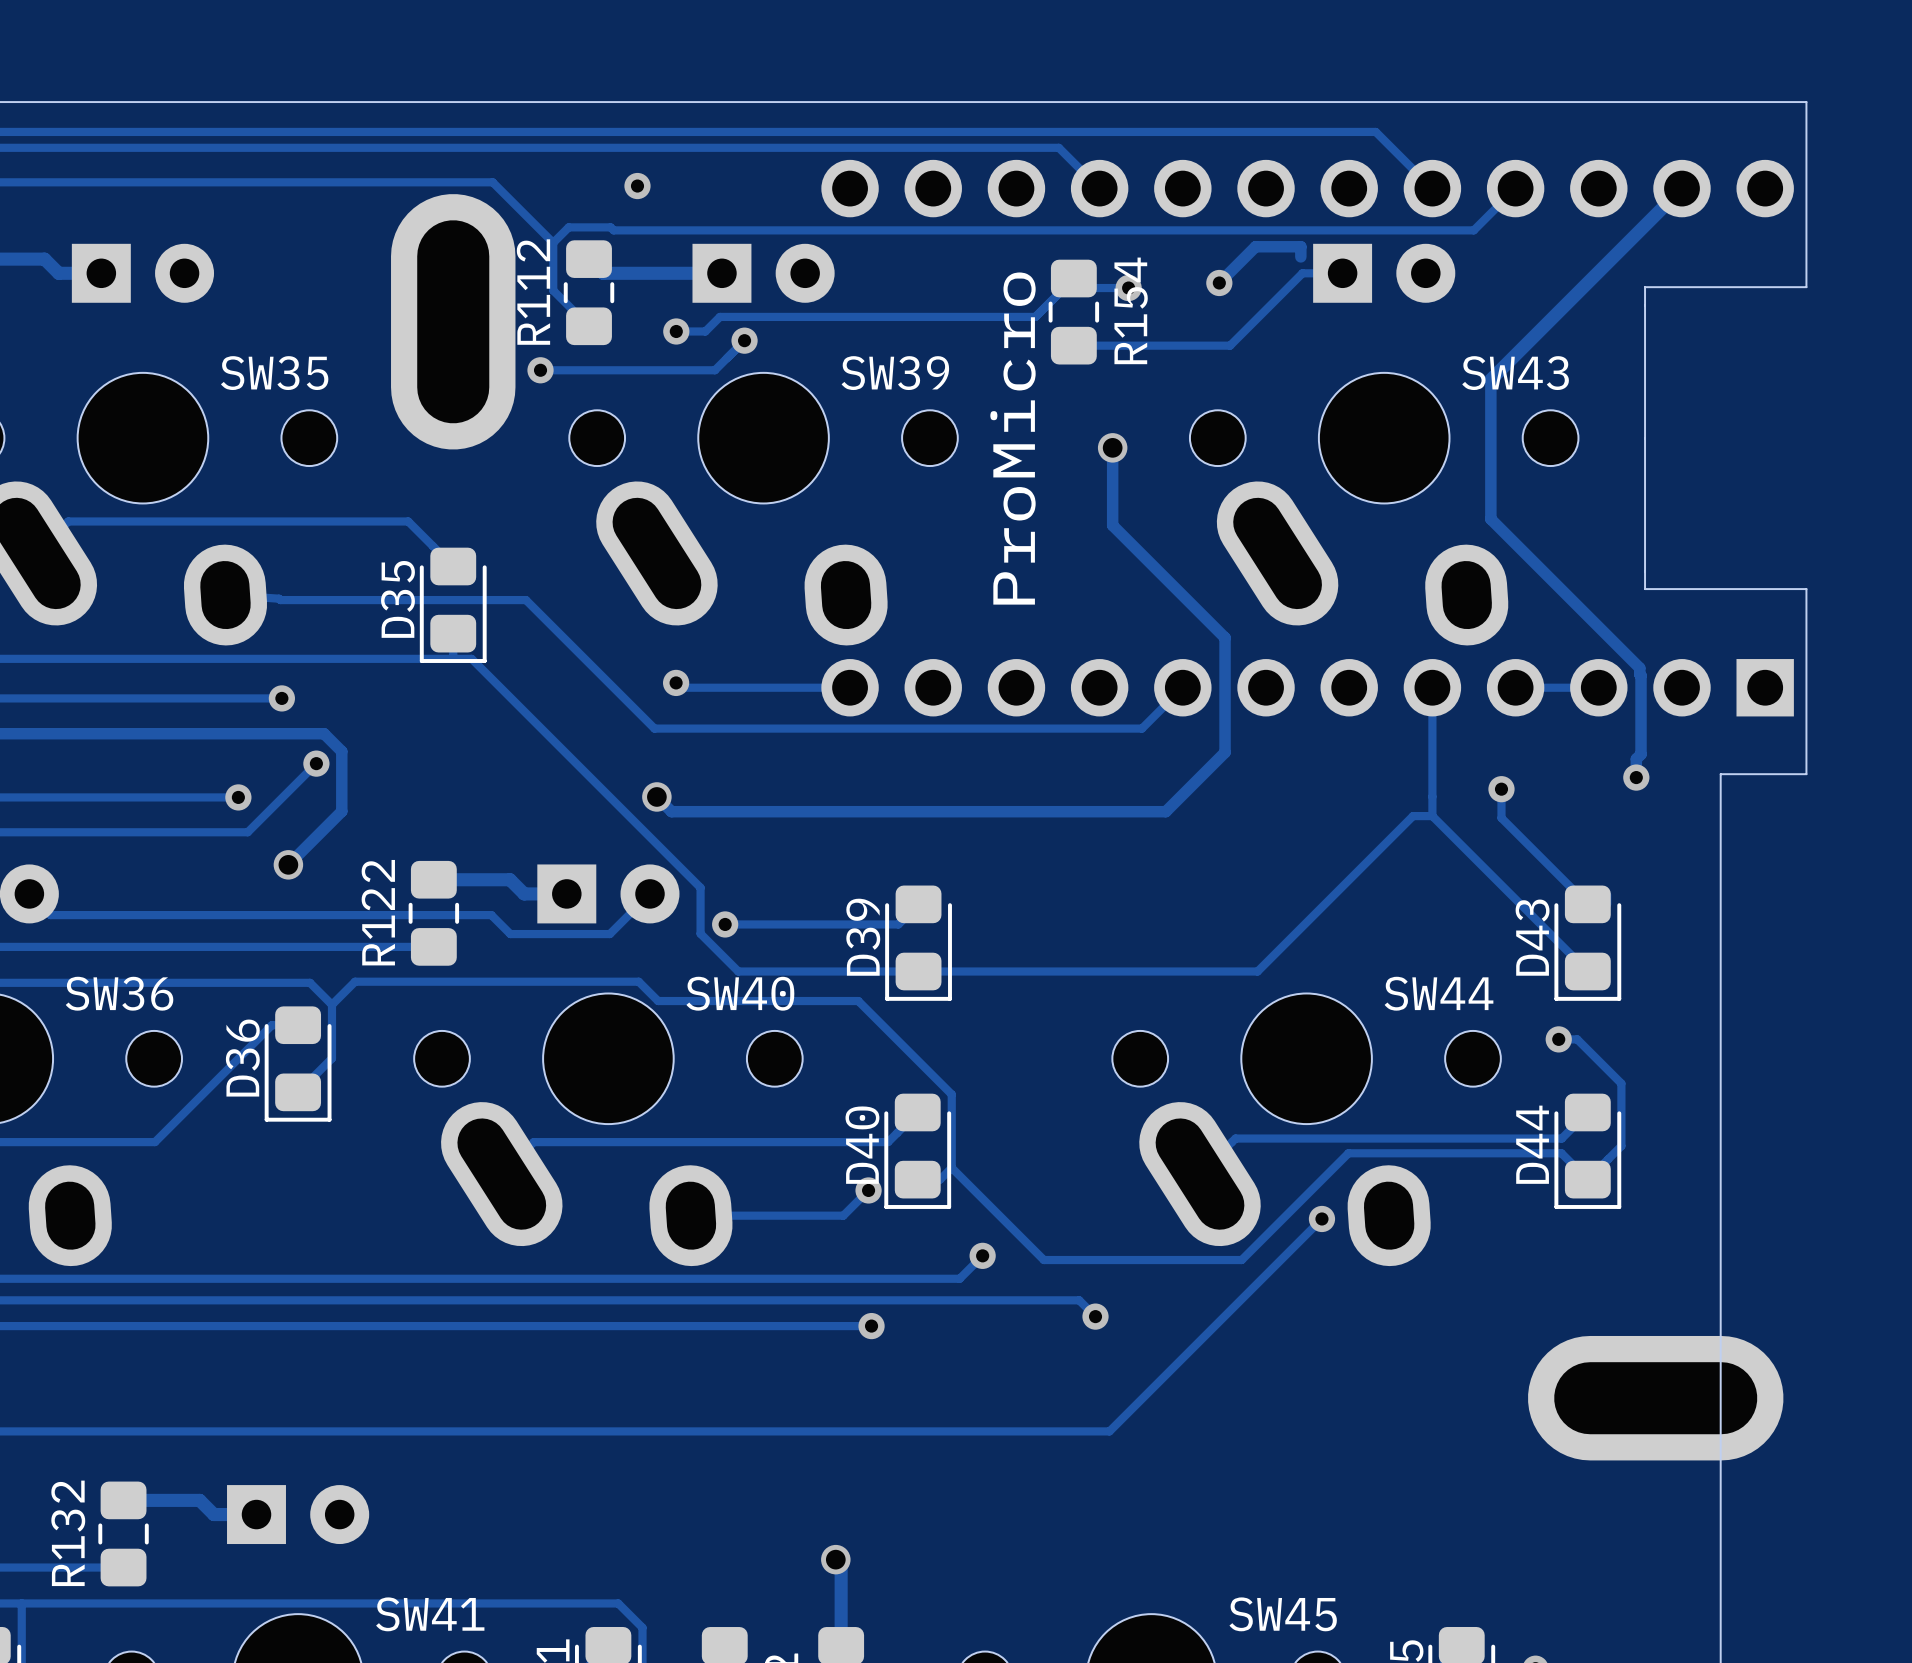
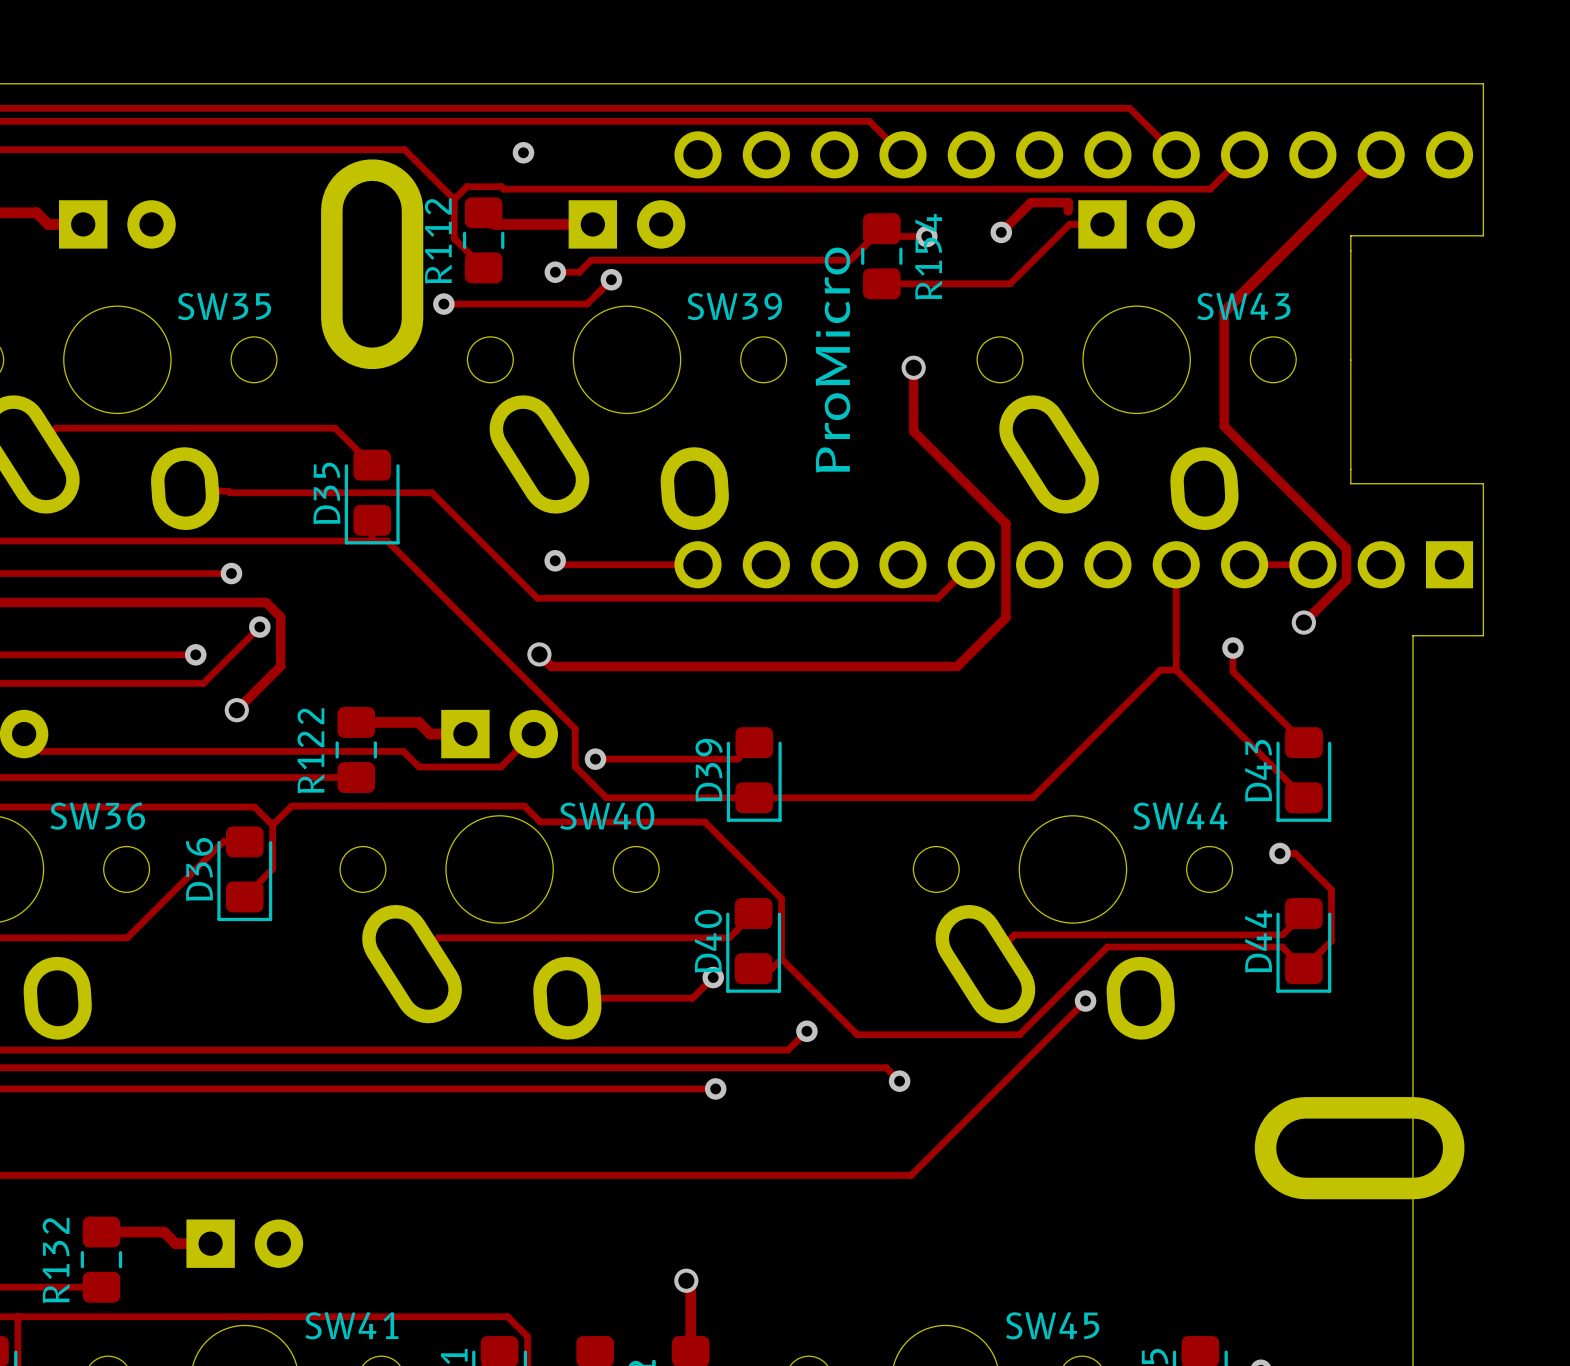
track: (1639, 674) (1641, 754) (1636, 759) (1636, 777) -> (1346, 553) (1346, 579) (1303, 622)
via: none -> (1303, 622)
via: (1636, 777) -> none

